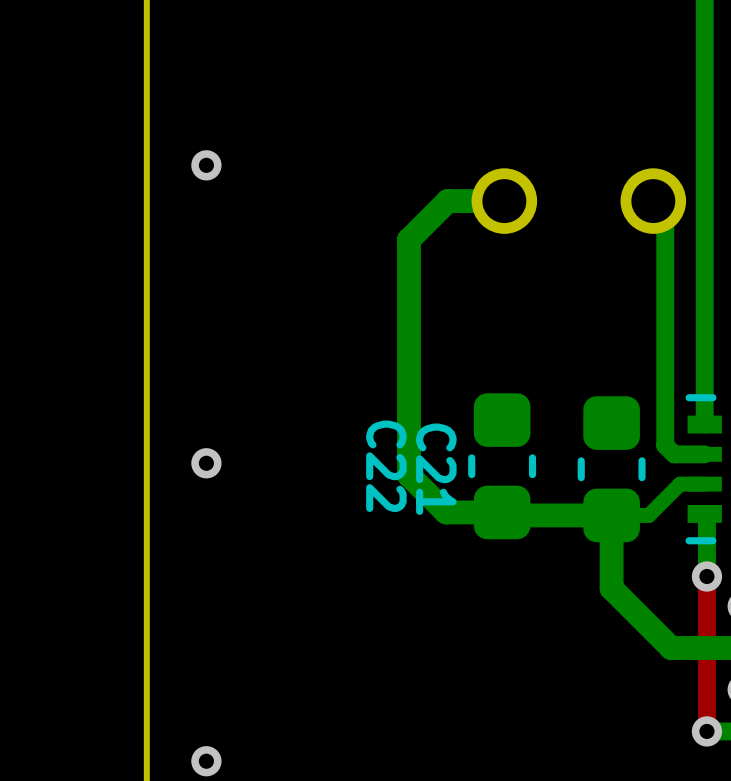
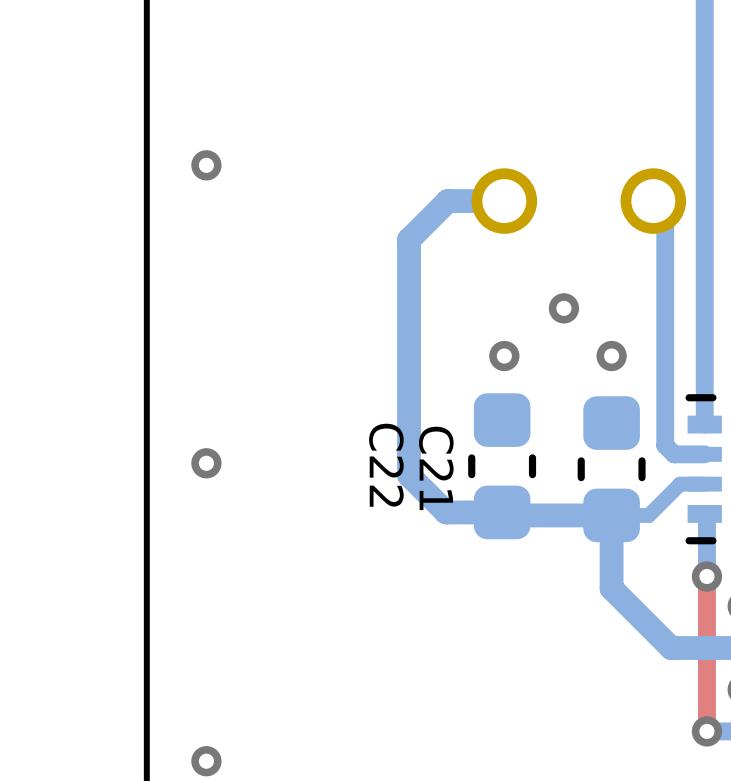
via: none -> (563, 308)
via: none -> (504, 356)
via: none -> (611, 356)

